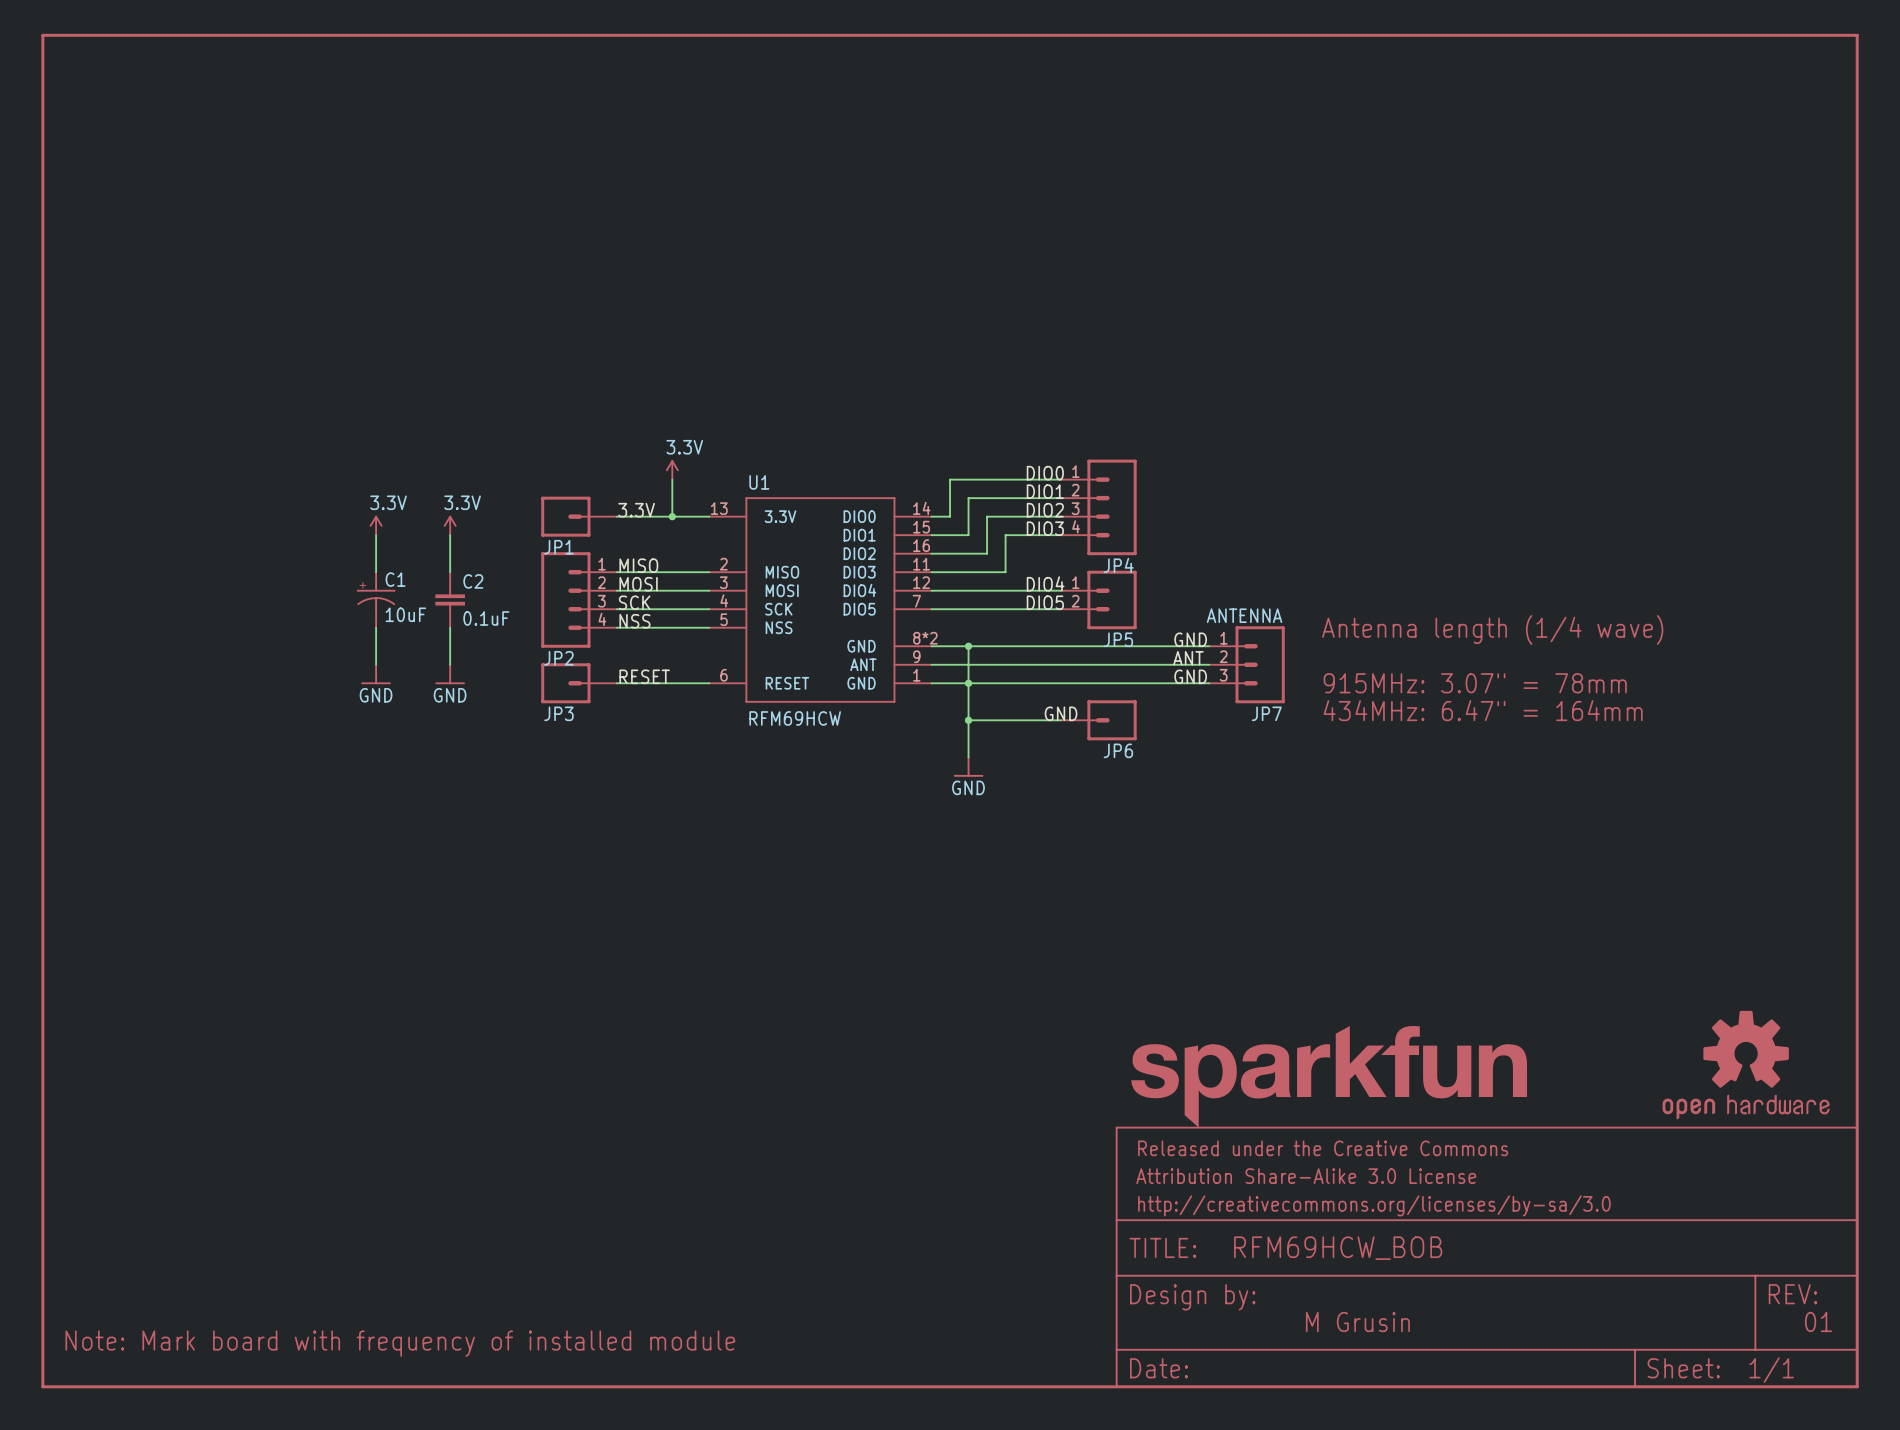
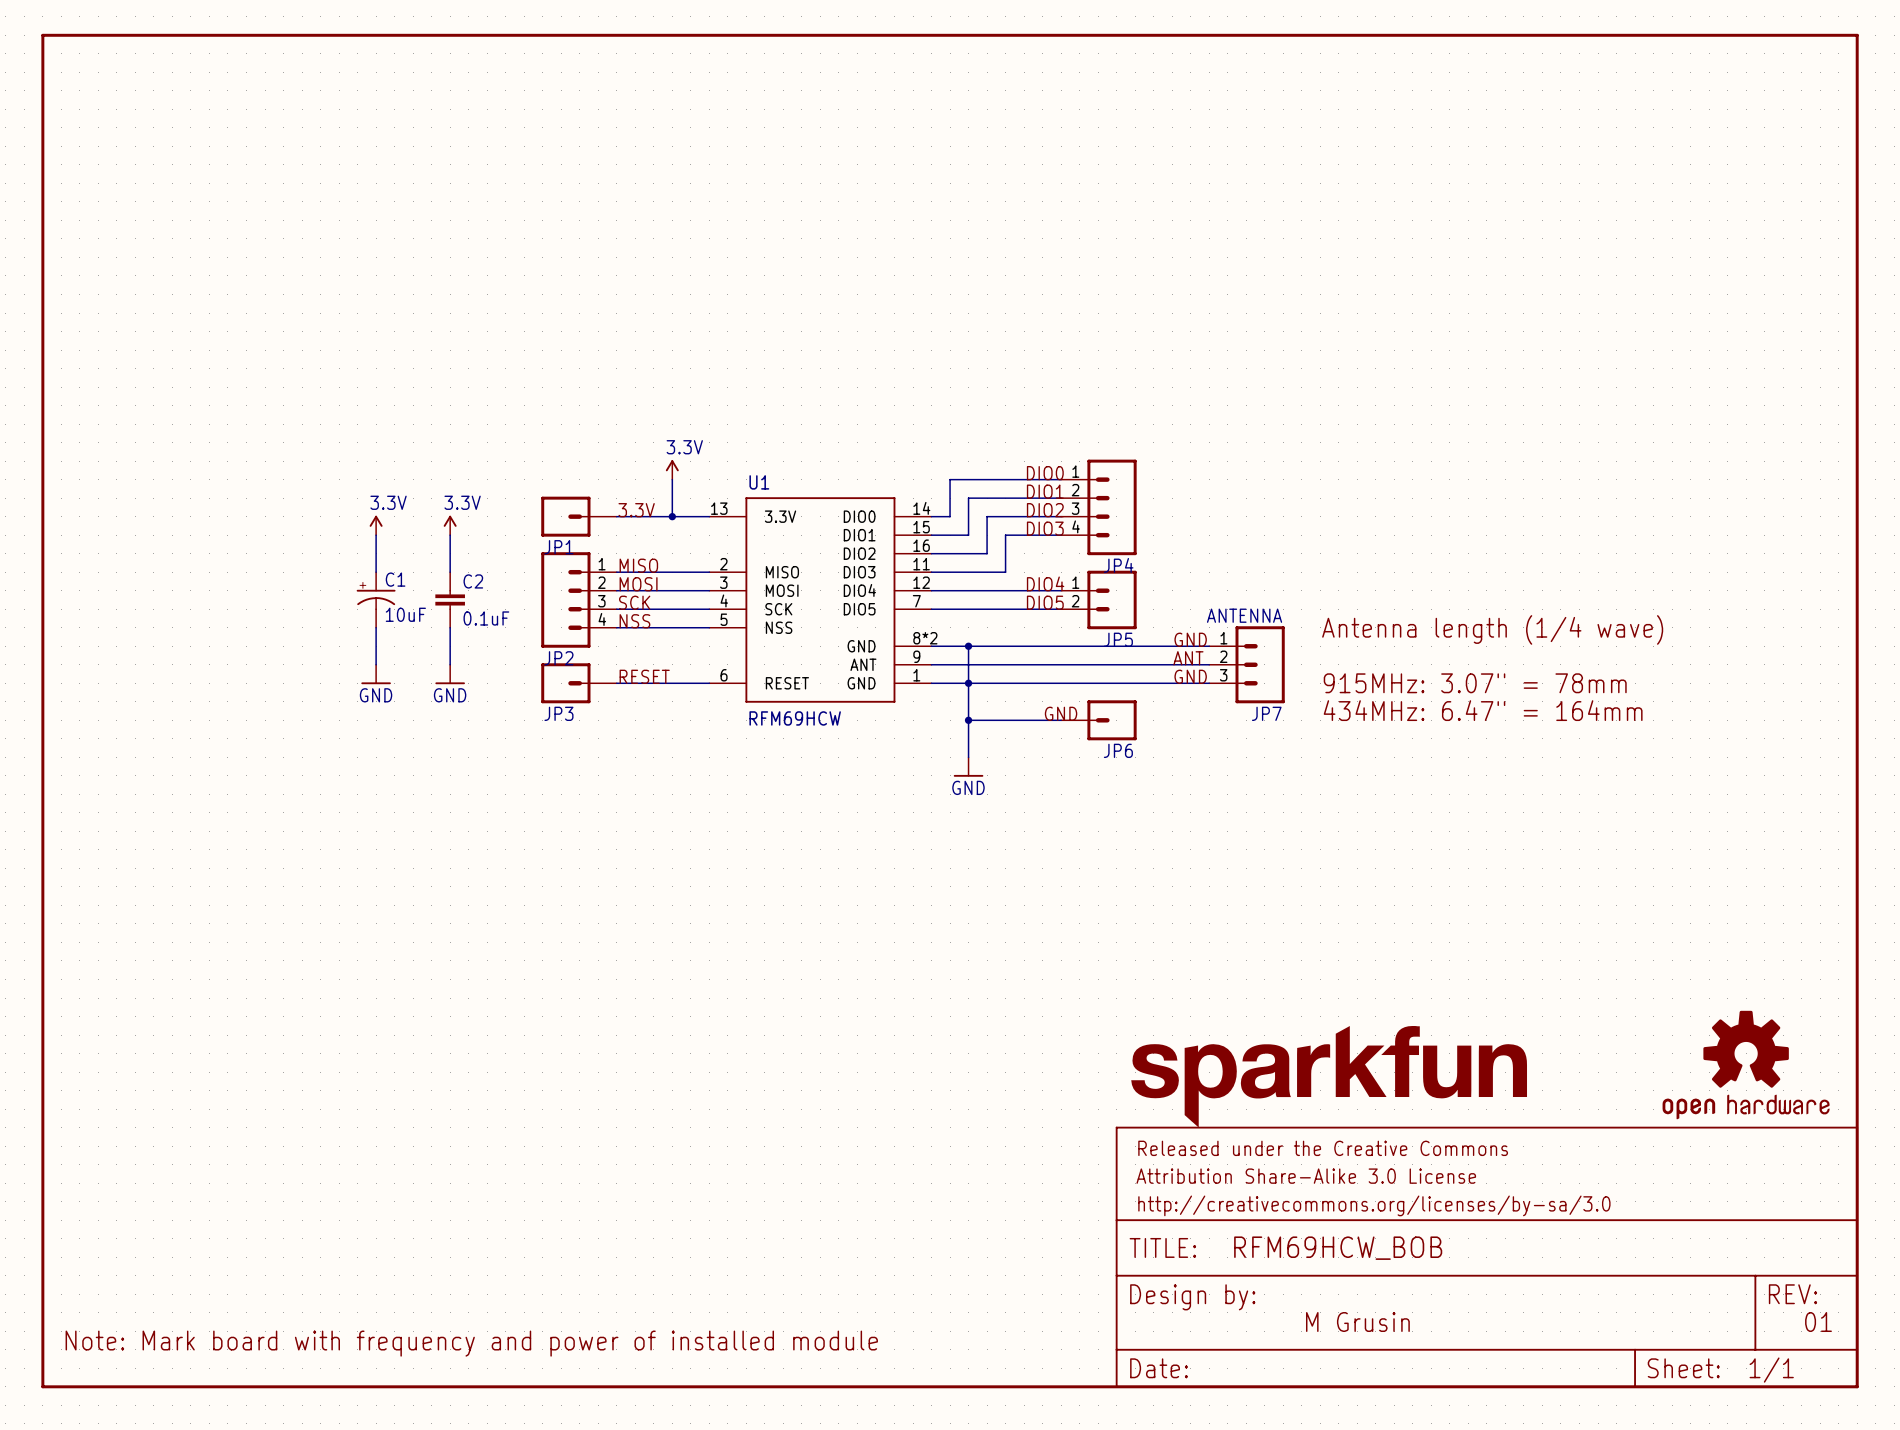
text: Note: Mark board with frequency of installed module (400, 1343) -> Note: Mark board with frequency and power of installed module (471, 1343)

